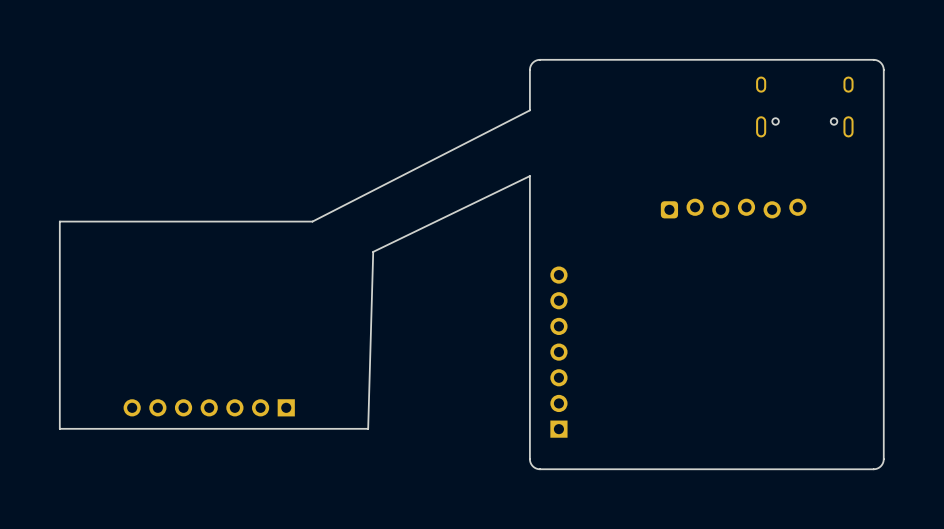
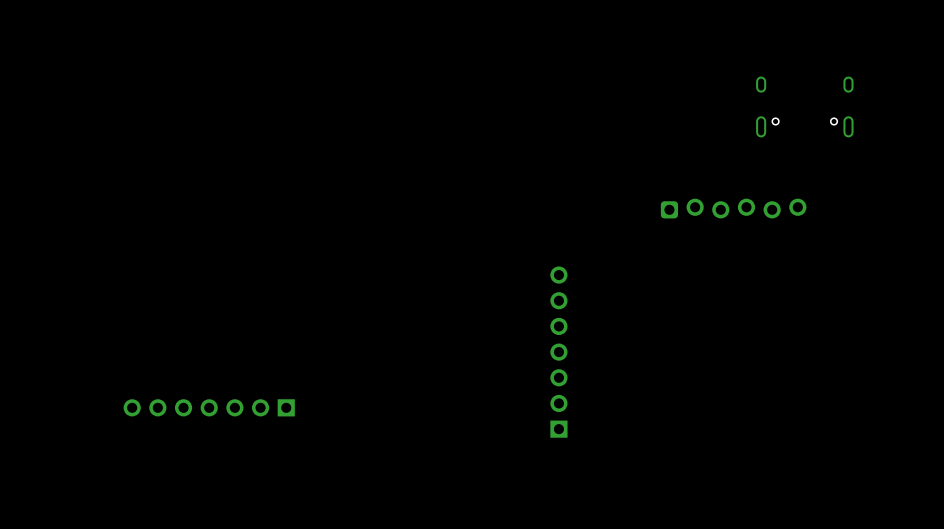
board edge: (873, 59) (537, 60) (532, 63) (530, 68) (529, 110) (312, 221) (59, 221) (59, 428) (368, 428) (373, 251) (529, 176) (529, 459) (533, 467) (540, 469) (877, 468) (881, 465) (883, 459) (883, 69) (880, 62) (873, 59) -> none

